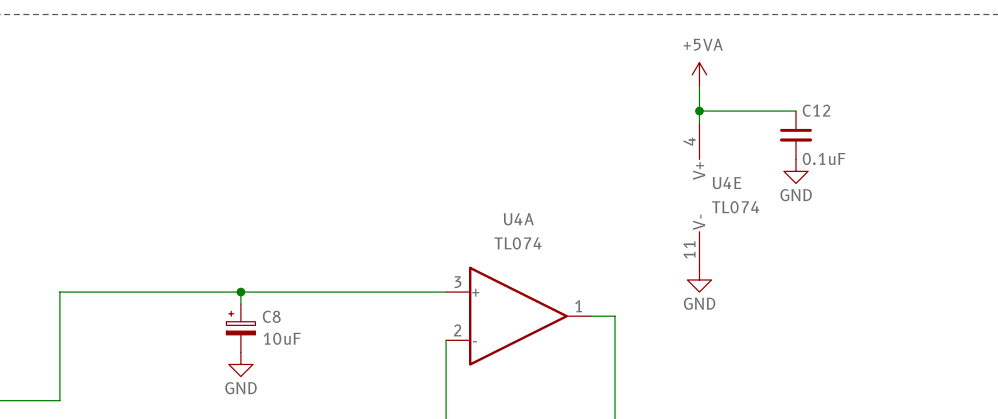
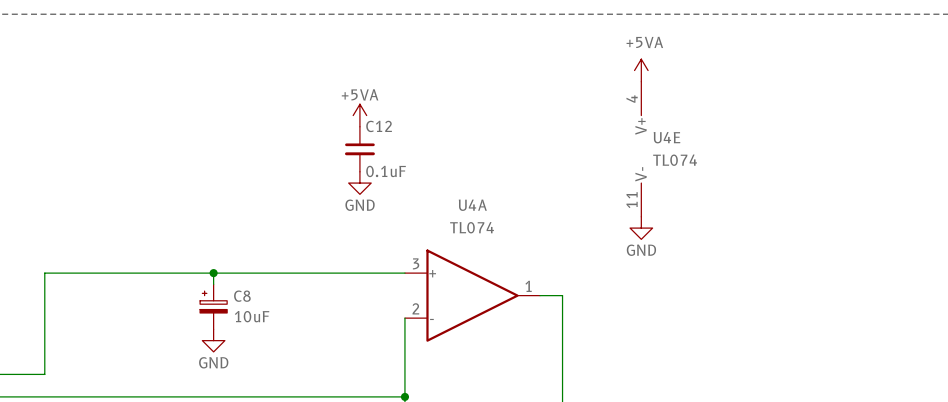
wire: (699, 111) (796, 111) -> none
junction: (699, 111) -> none
power symbol: none -> +5VA (359, 115)
C12 position: (796, 135) -> (359, 149)
power symbol: GND (796, 171) -> none
power symbol: none -> GND (359, 183)
U4E position: (699, 195) -> (641, 149)
power symbol position: GND (699, 279) -> GND (641, 228)

